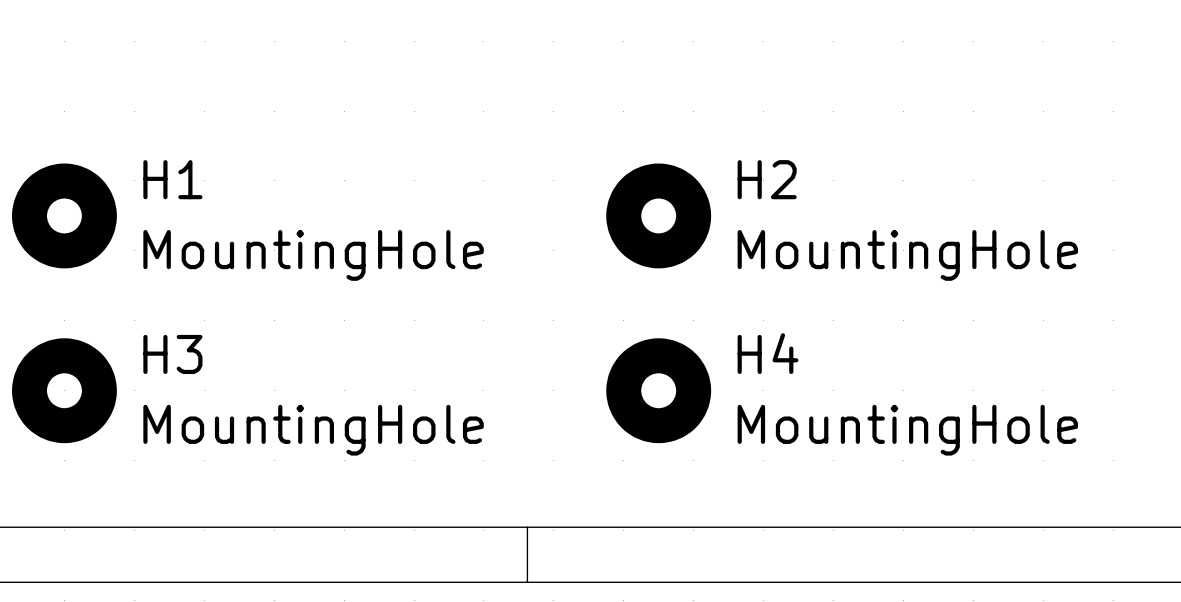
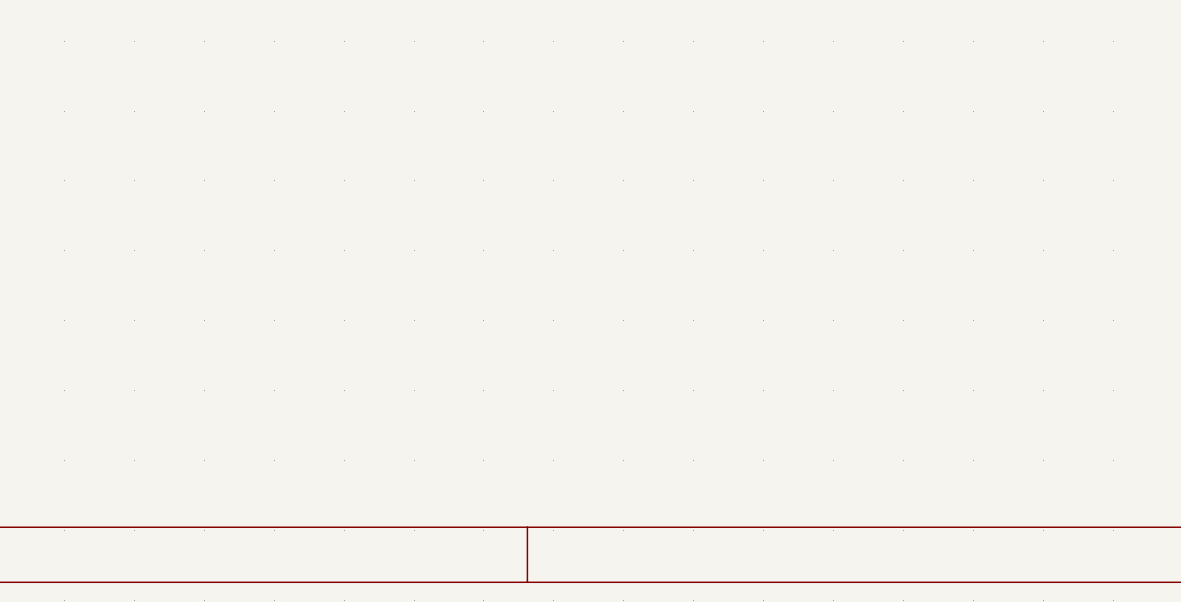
H1: MountingHole (64, 215) -> none
H2: MountingHole (658, 215) -> none
H3: MountingHole (64, 390) -> none
H4: MountingHole (658, 390) -> none

